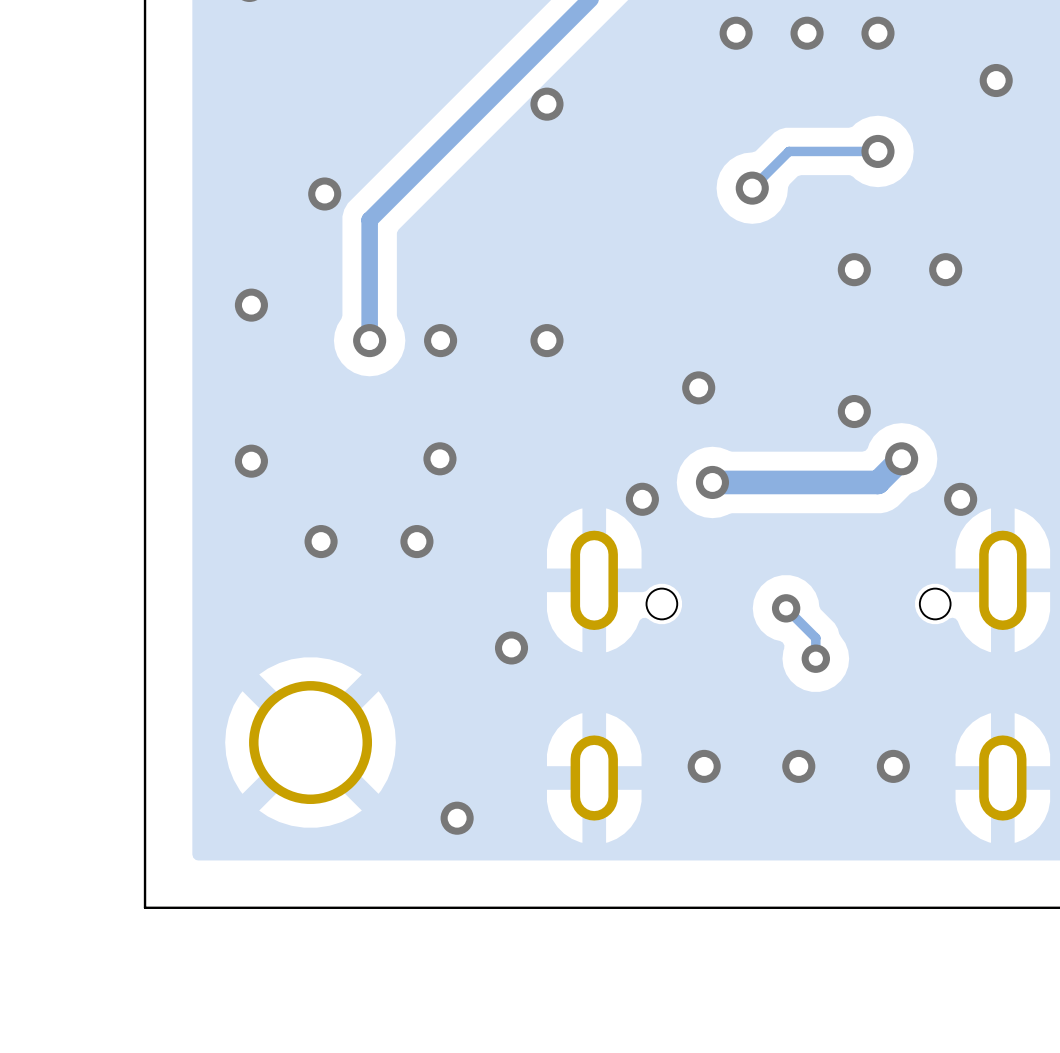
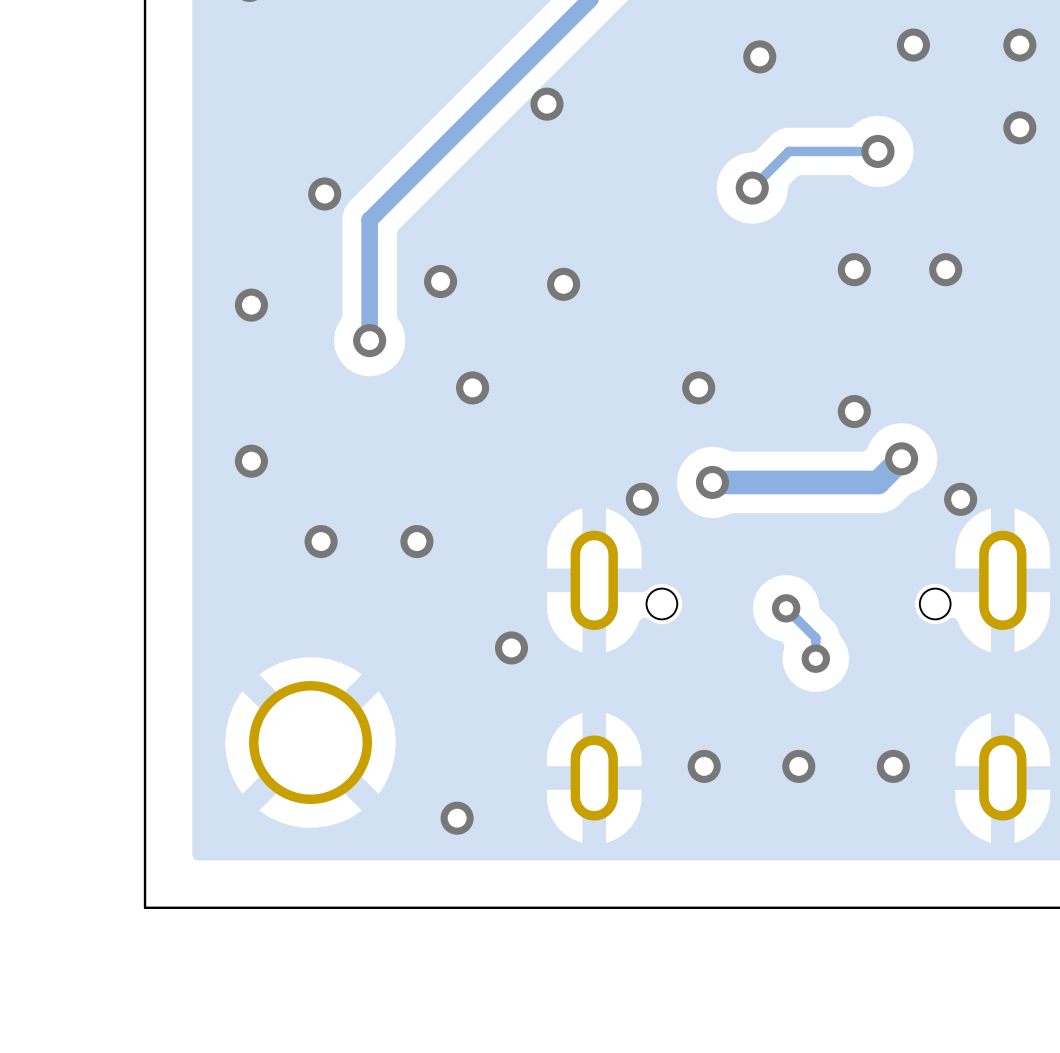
via position: (736, 33) -> (759, 56)
via: (807, 33) -> none
via position: (877, 33) -> (913, 45)
via: none -> (1019, 45)
via: (996, 80) -> none
via: none -> (1019, 127)
via: none -> (440, 281)
via: none -> (563, 284)
via: (440, 340) -> none
via: (546, 340) -> none
via: none -> (472, 387)
via: (439, 458) -> none

